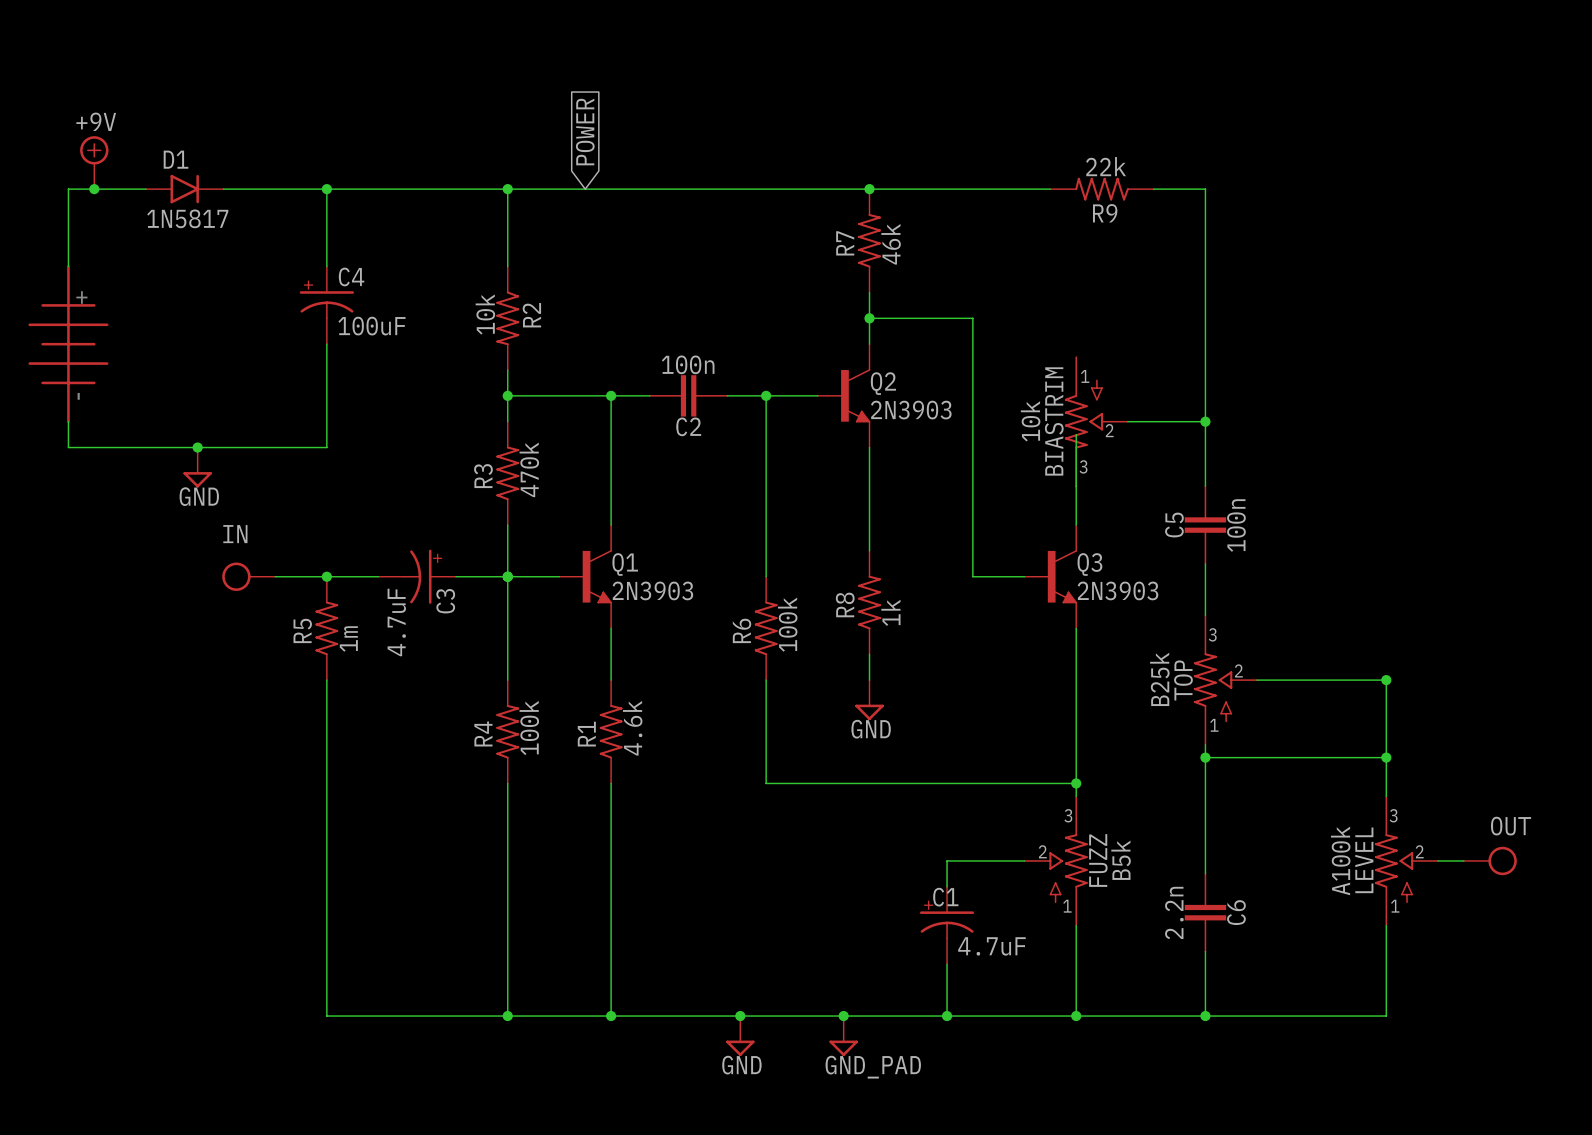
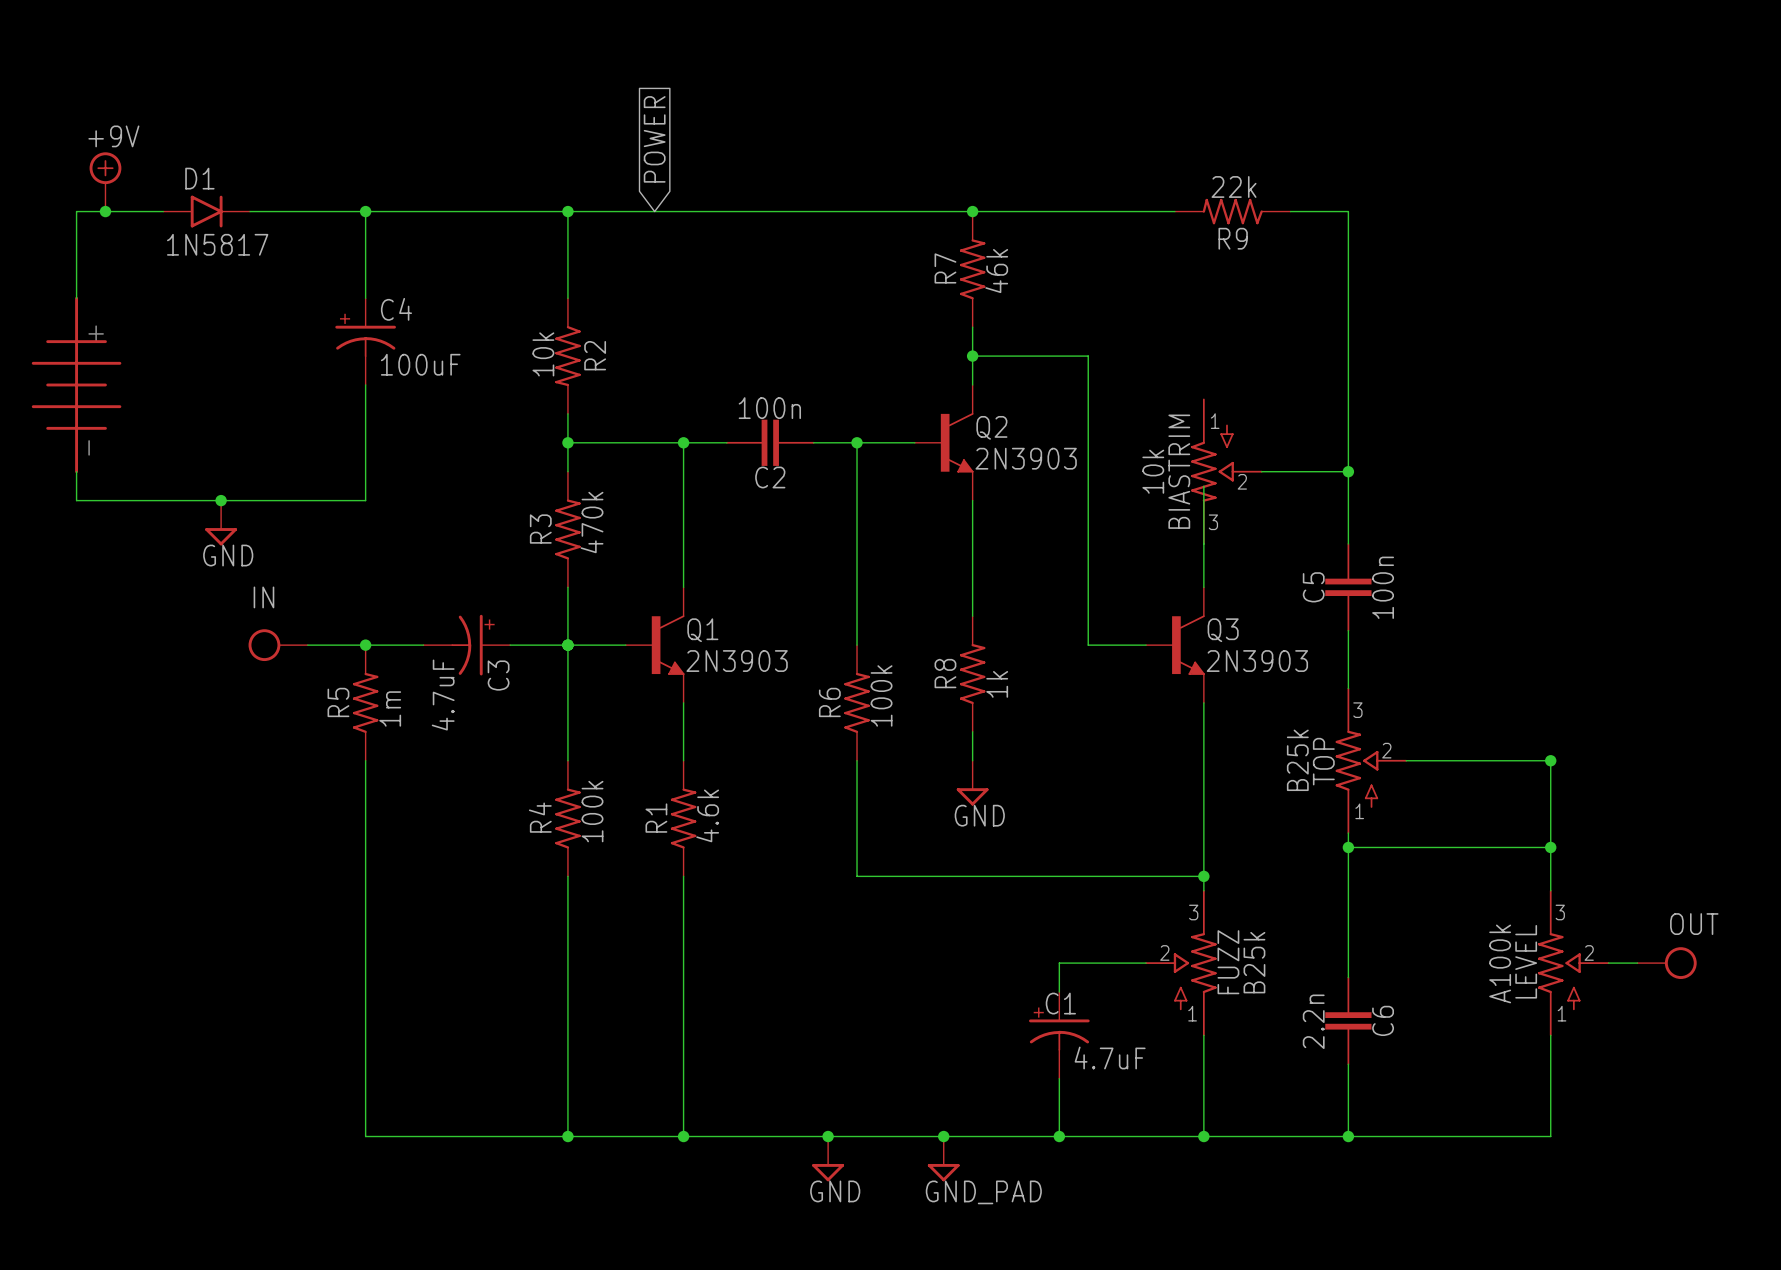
FUZZ value: B5k (1121, 860) -> B25k (1254, 962)

